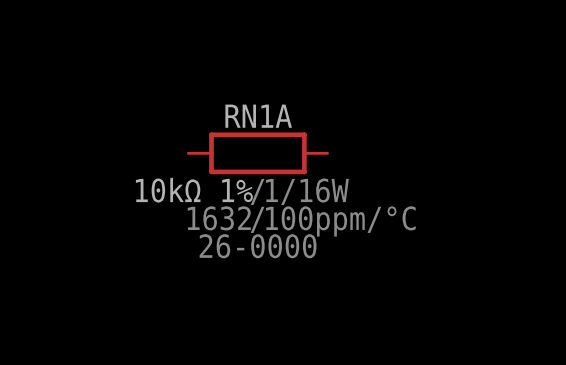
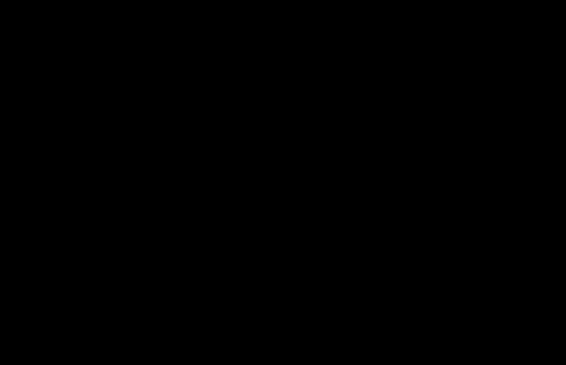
RN1A: 10kΩ 1% (257, 153) -> none

